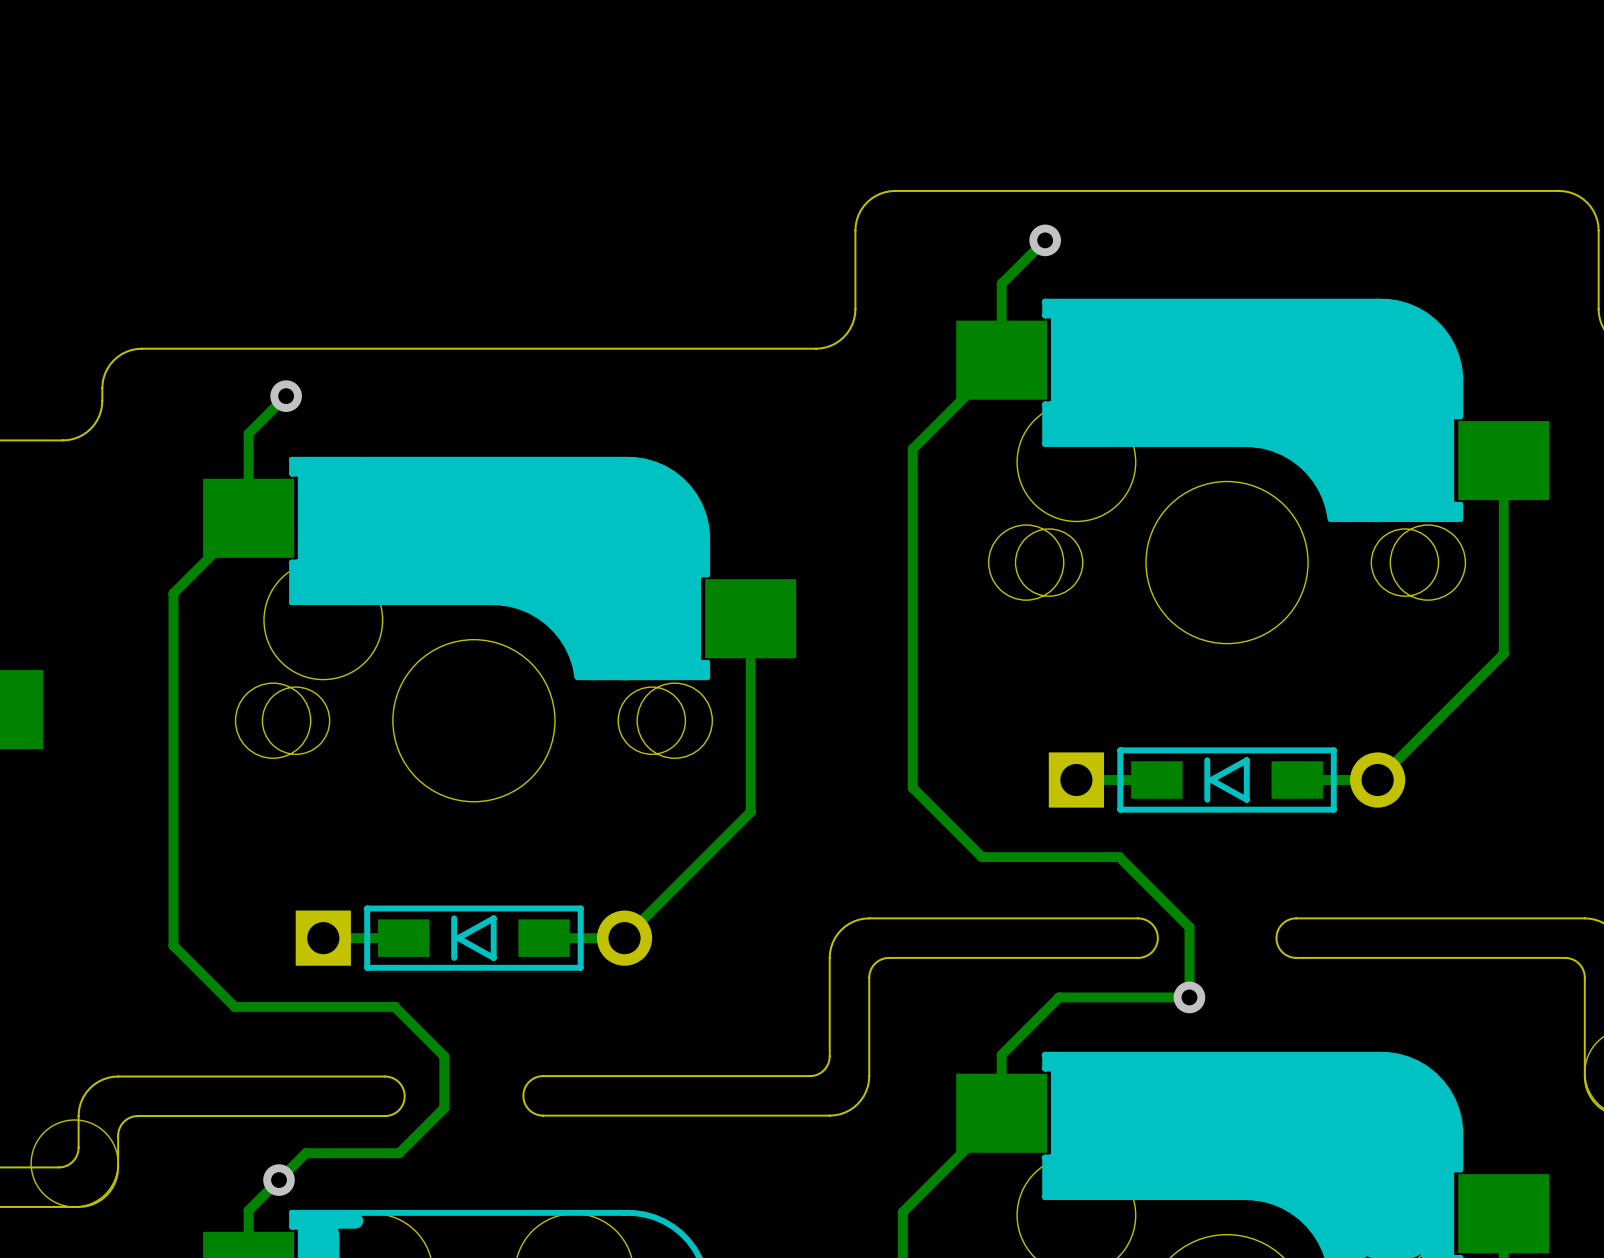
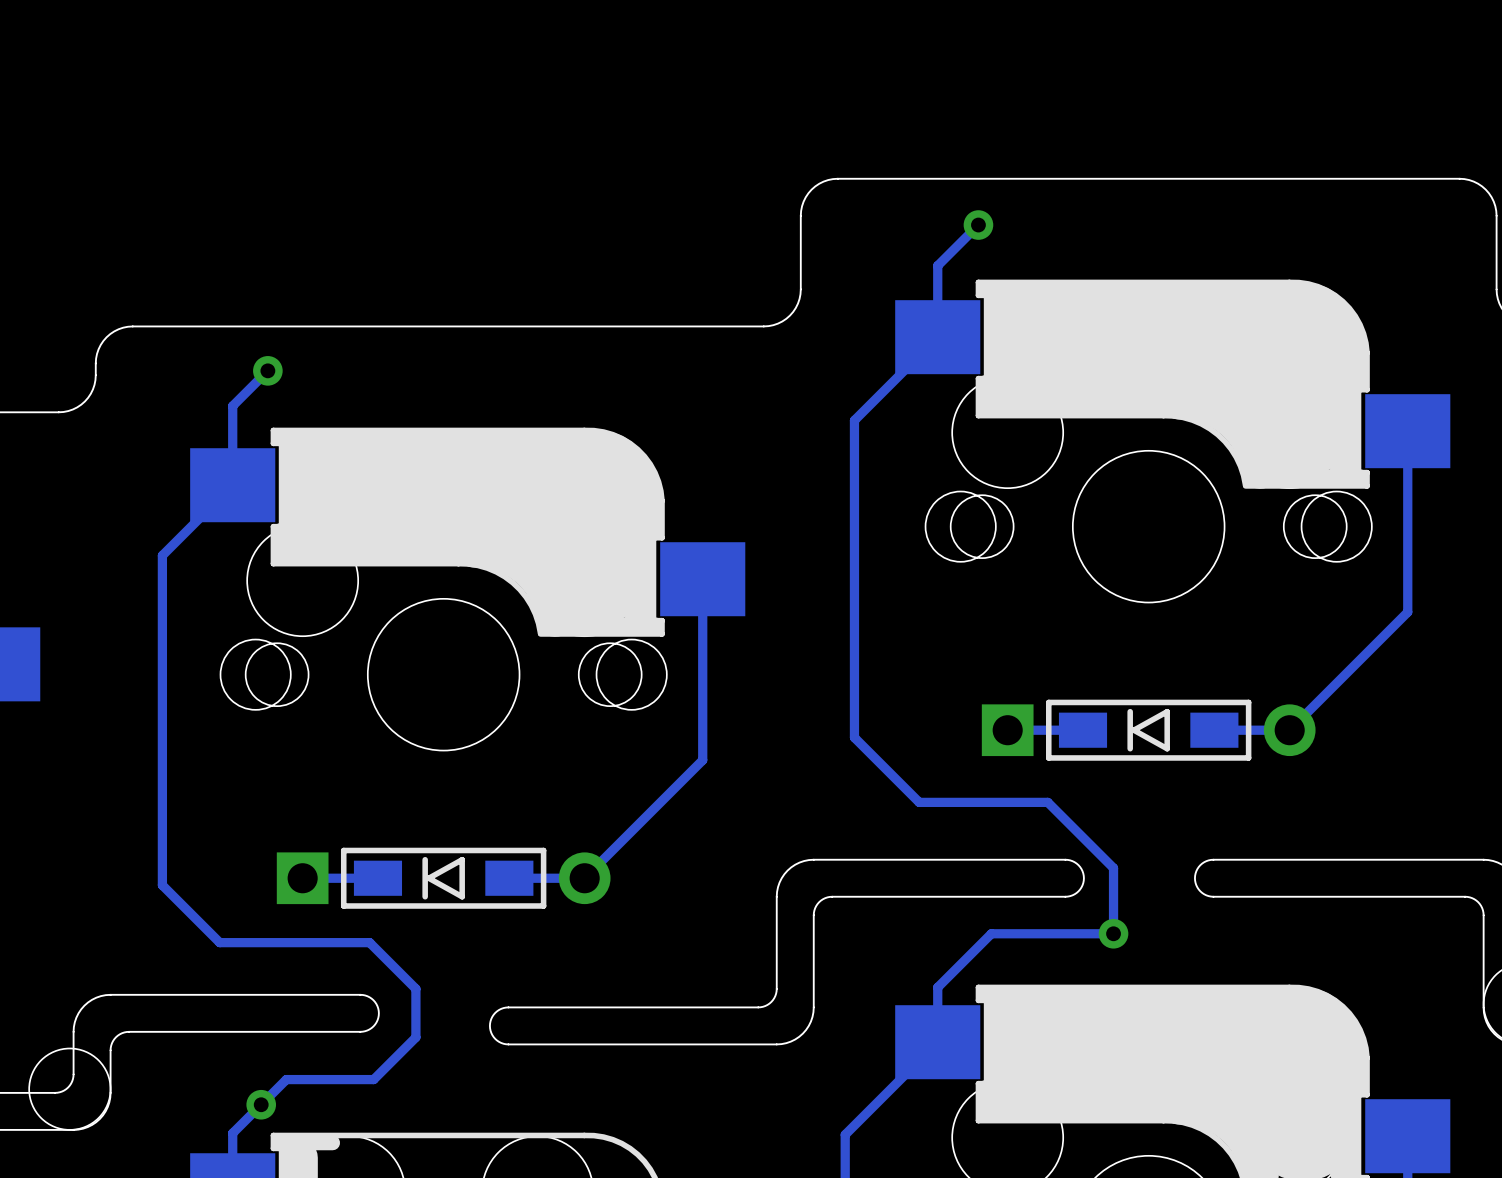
board edge: (78, 1116) (79, 1105) (86, 1091) (98, 1081) (112, 1076) (384, 1076) (392, 1078) (398, 1082) (404, 1093) (404, 1101) (400, 1108) (394, 1113) (387, 1115) (135, 1116) (123, 1121) (119, 1128) (118, 1135) -> (73, 1044) (73, 1027) (78, 1013) (92, 999) (105, 995) (360, 994) (371, 998) (378, 1008) (378, 1018) (375, 1024) (362, 1031) (124, 1032) (116, 1037) (111, 1043) (110, 1063)

